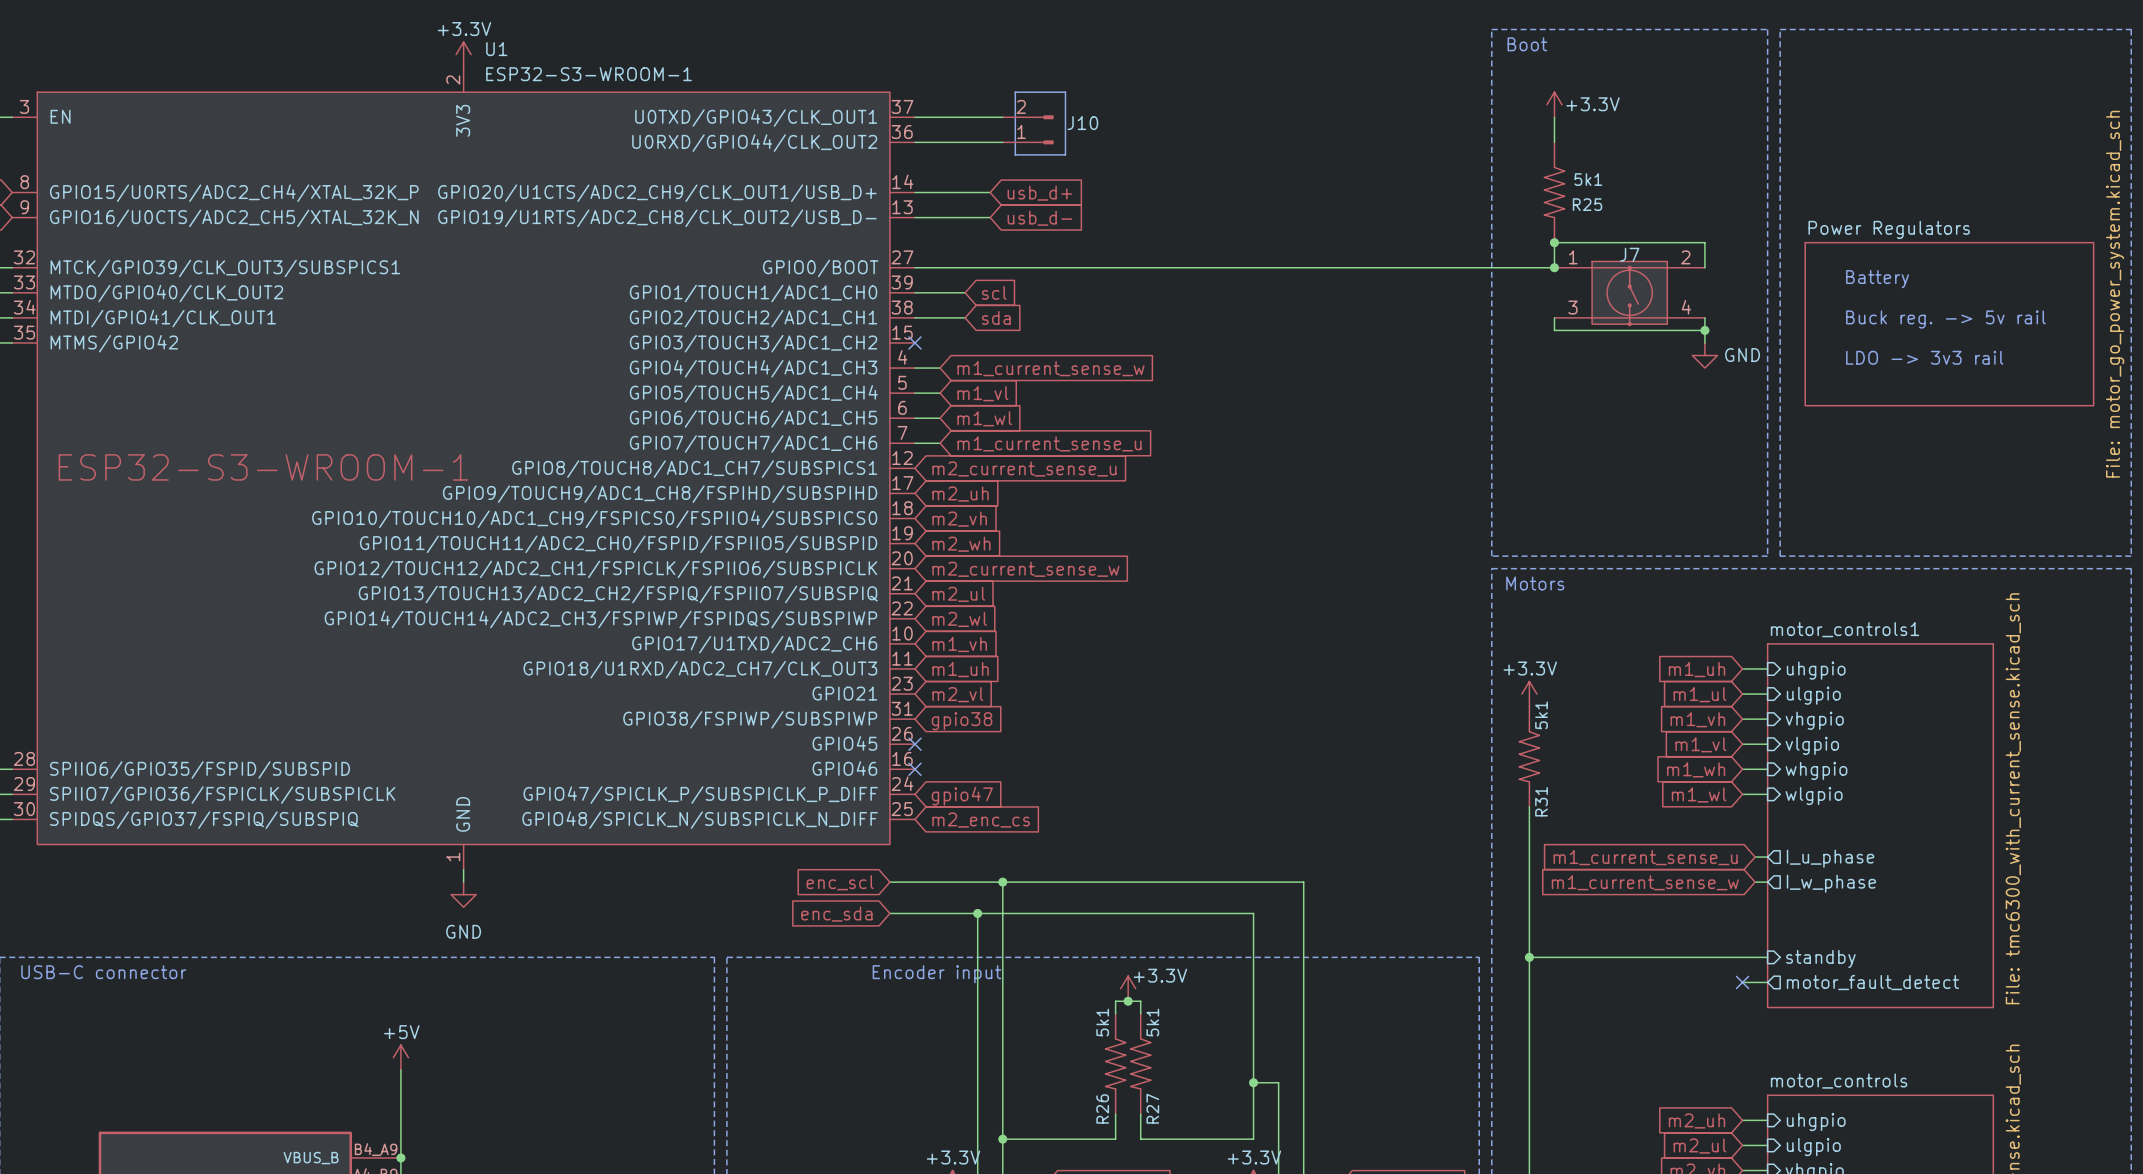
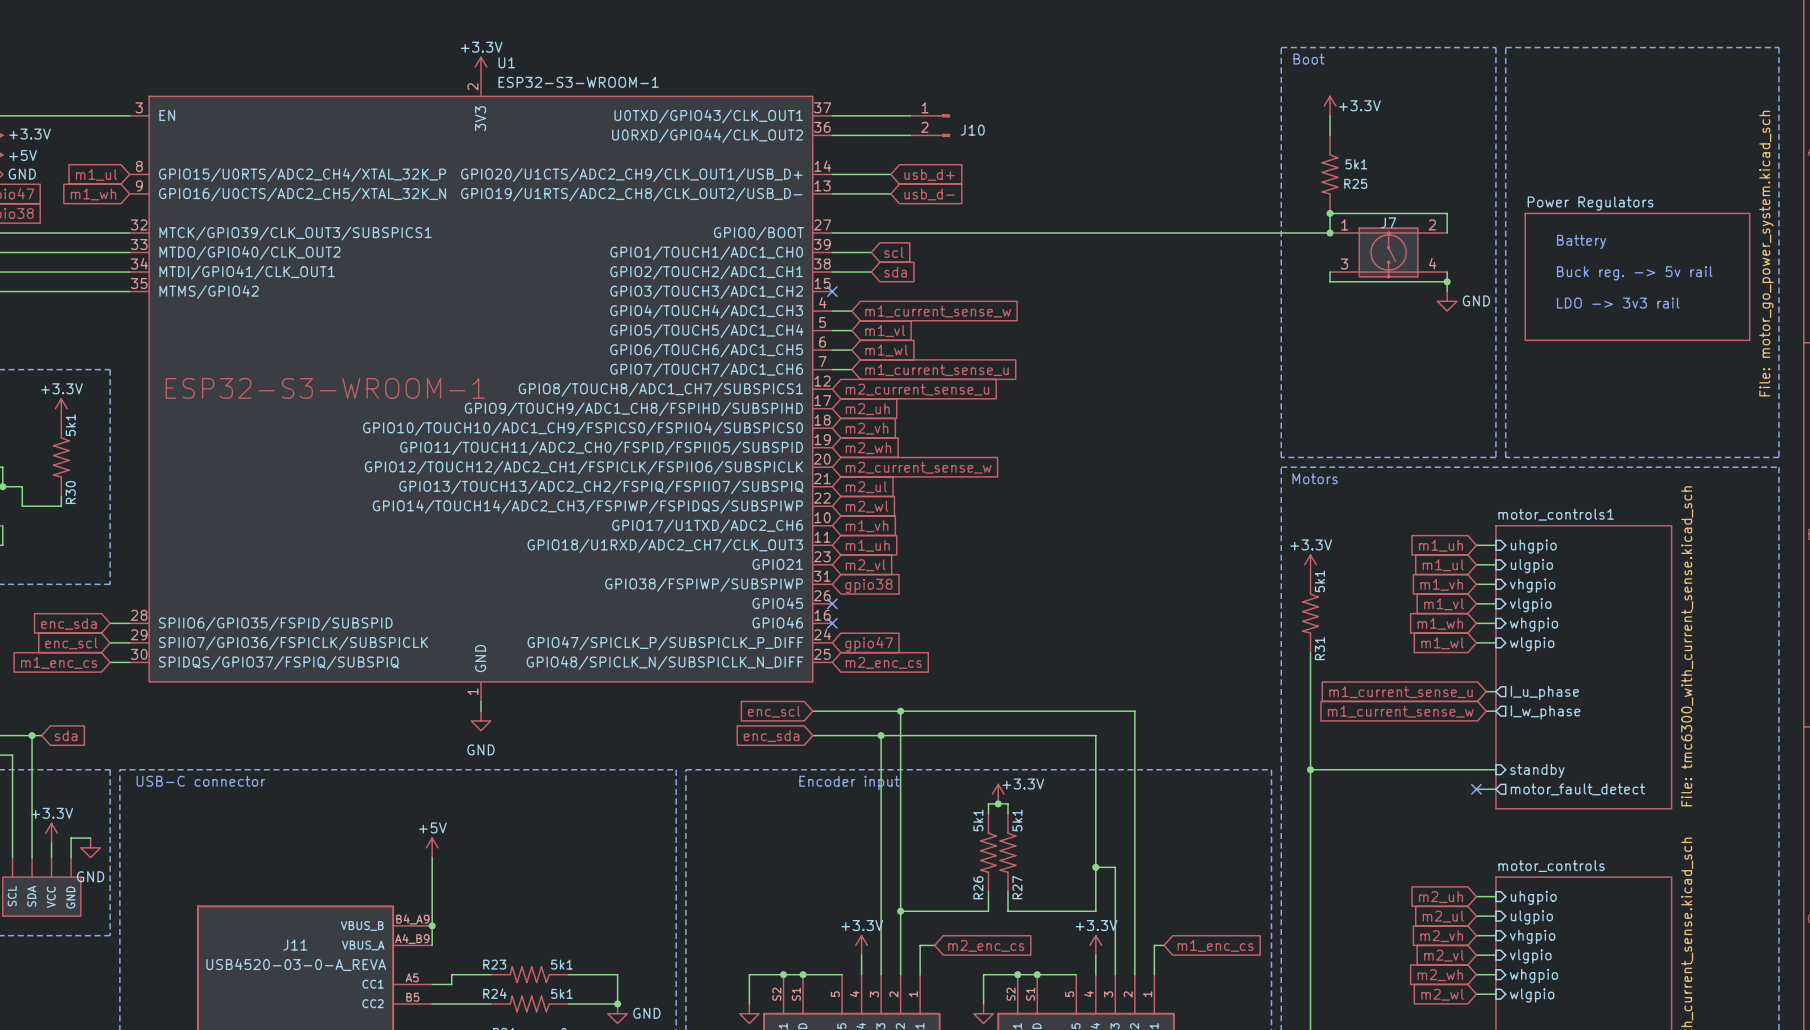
line: (1015, 92) (1065, 92) (1065, 154) (1015, 154) (1015, 92) -> none
J10 flip: as is (1046, 129) -> up-down (944, 125)

